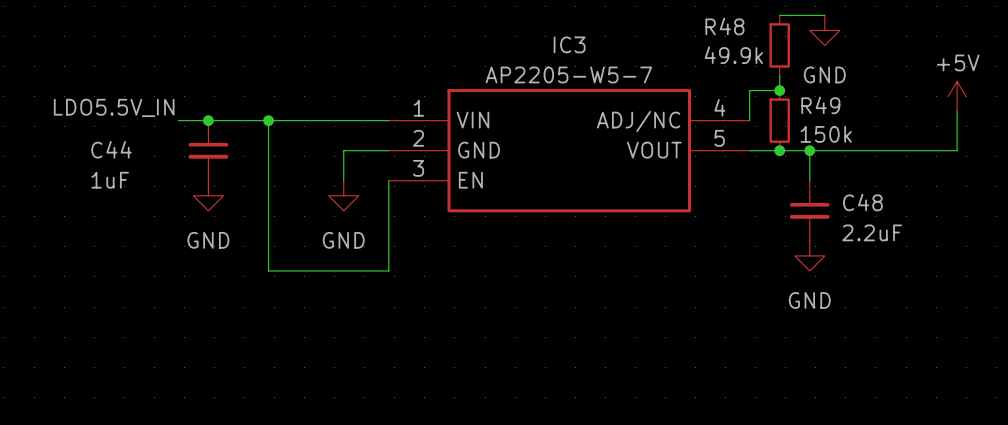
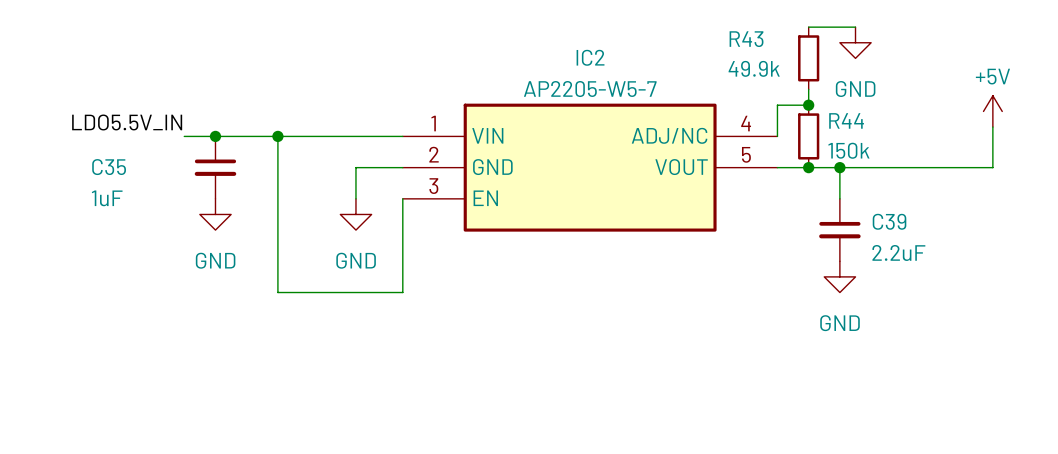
R48 name: R48 (724, 26) -> R43 (746, 39)
IC3 name: IC3 (569, 44) -> IC2 (590, 57)
R49 name: R49 (820, 105) -> R44 (846, 120)
C44 name: C44 (111, 149) -> C35 (109, 167)
C48 name: C48 (862, 202) -> C39 (889, 221)

